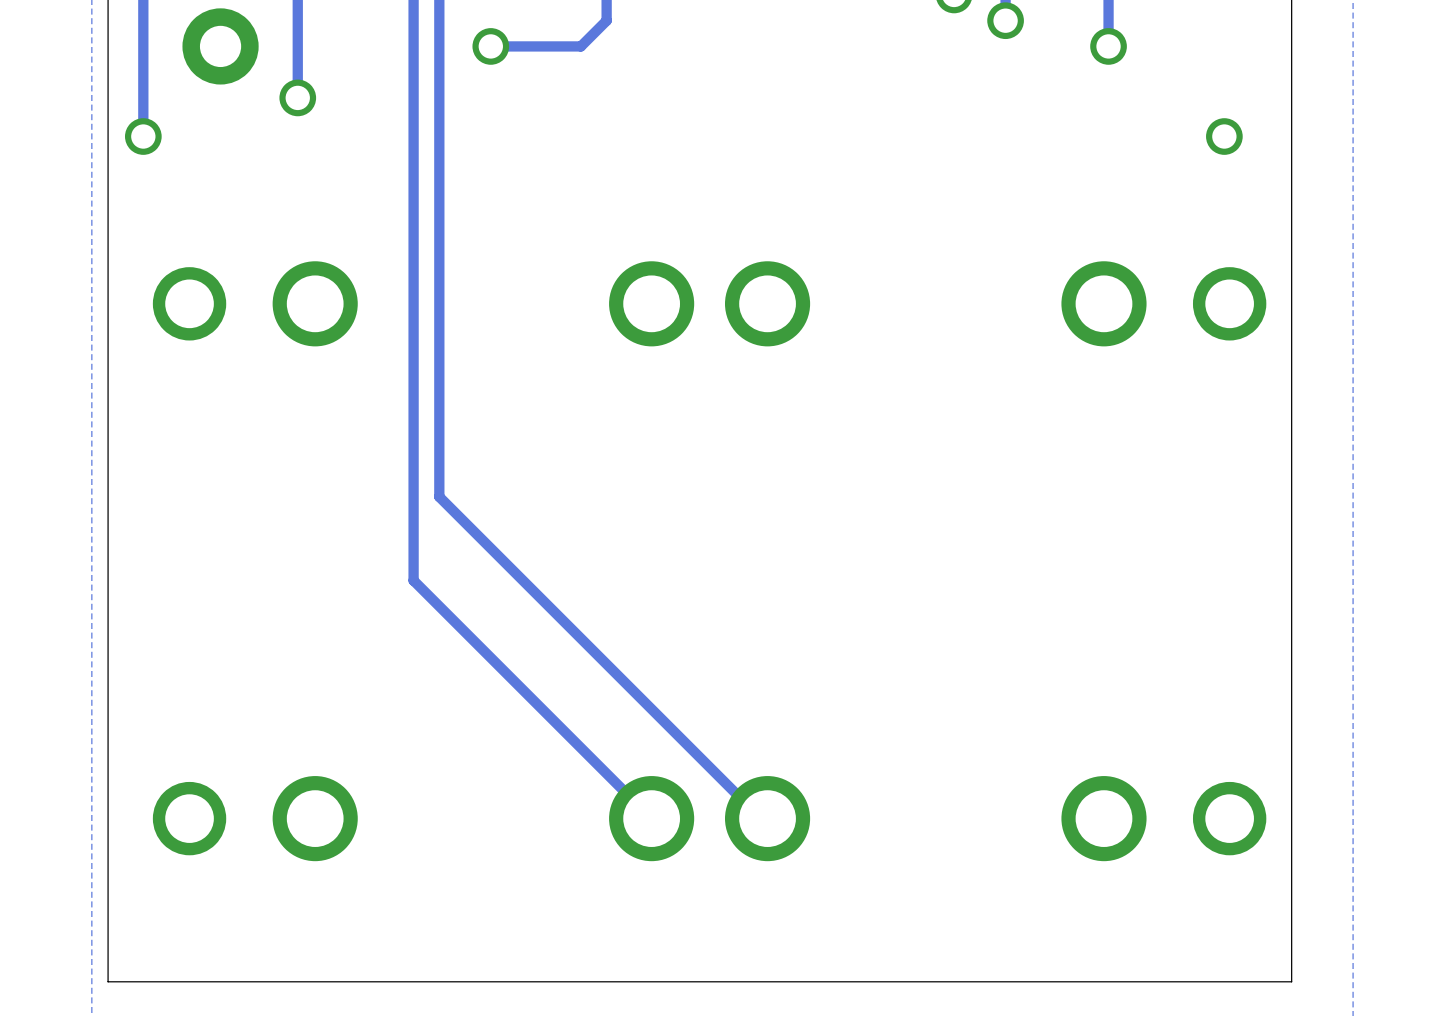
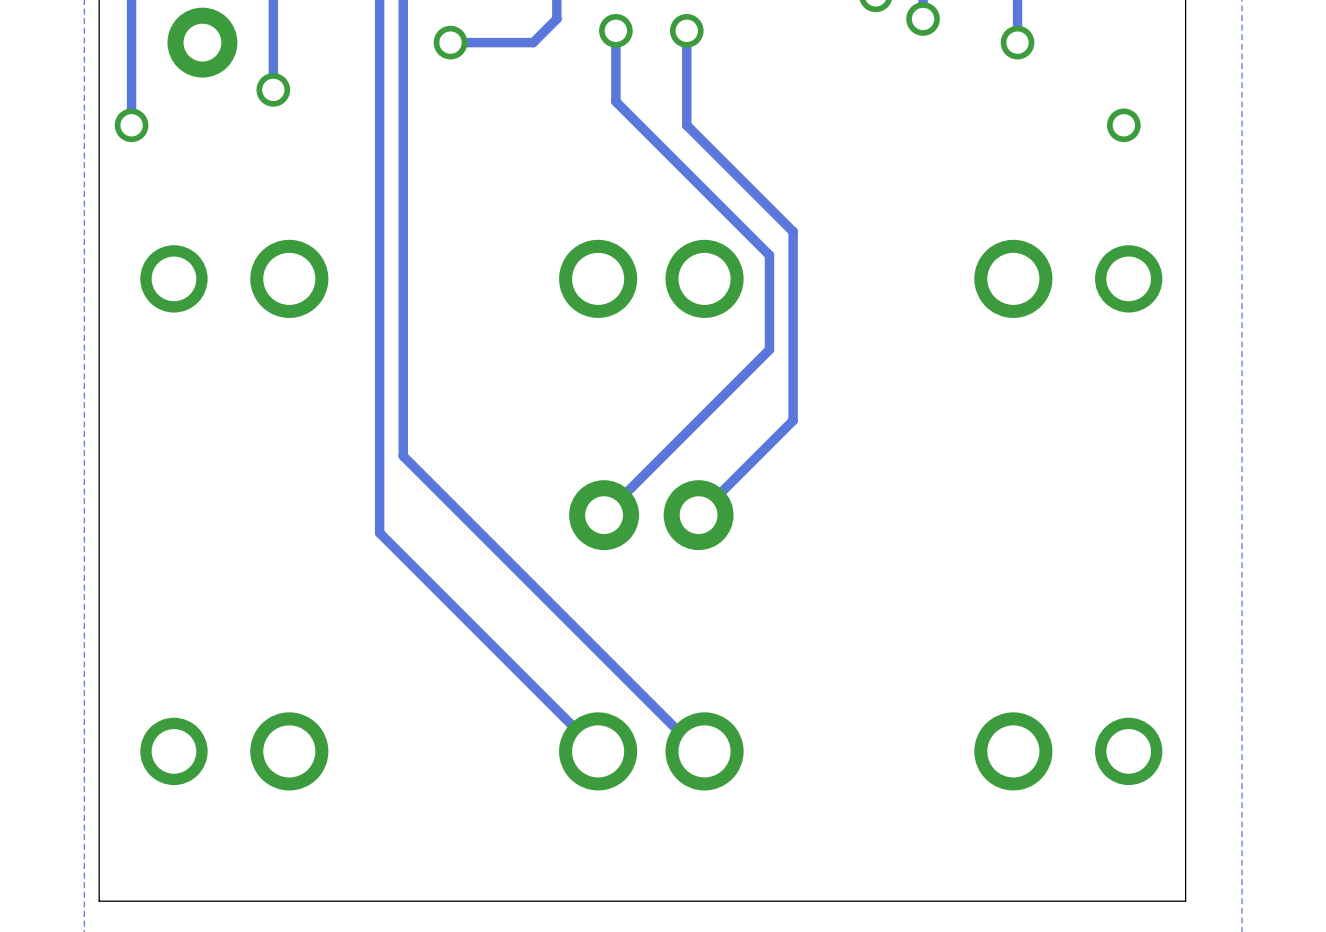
track: none -> (615, 30) (615, 101) (769, 255) (769, 349) (604, 515)
via: none -> (615, 30)
track: none -> (686, 30) (686, 125) (793, 231) (793, 420) (698, 515)
via: none -> (686, 30)
part: none -> (651, 515)

